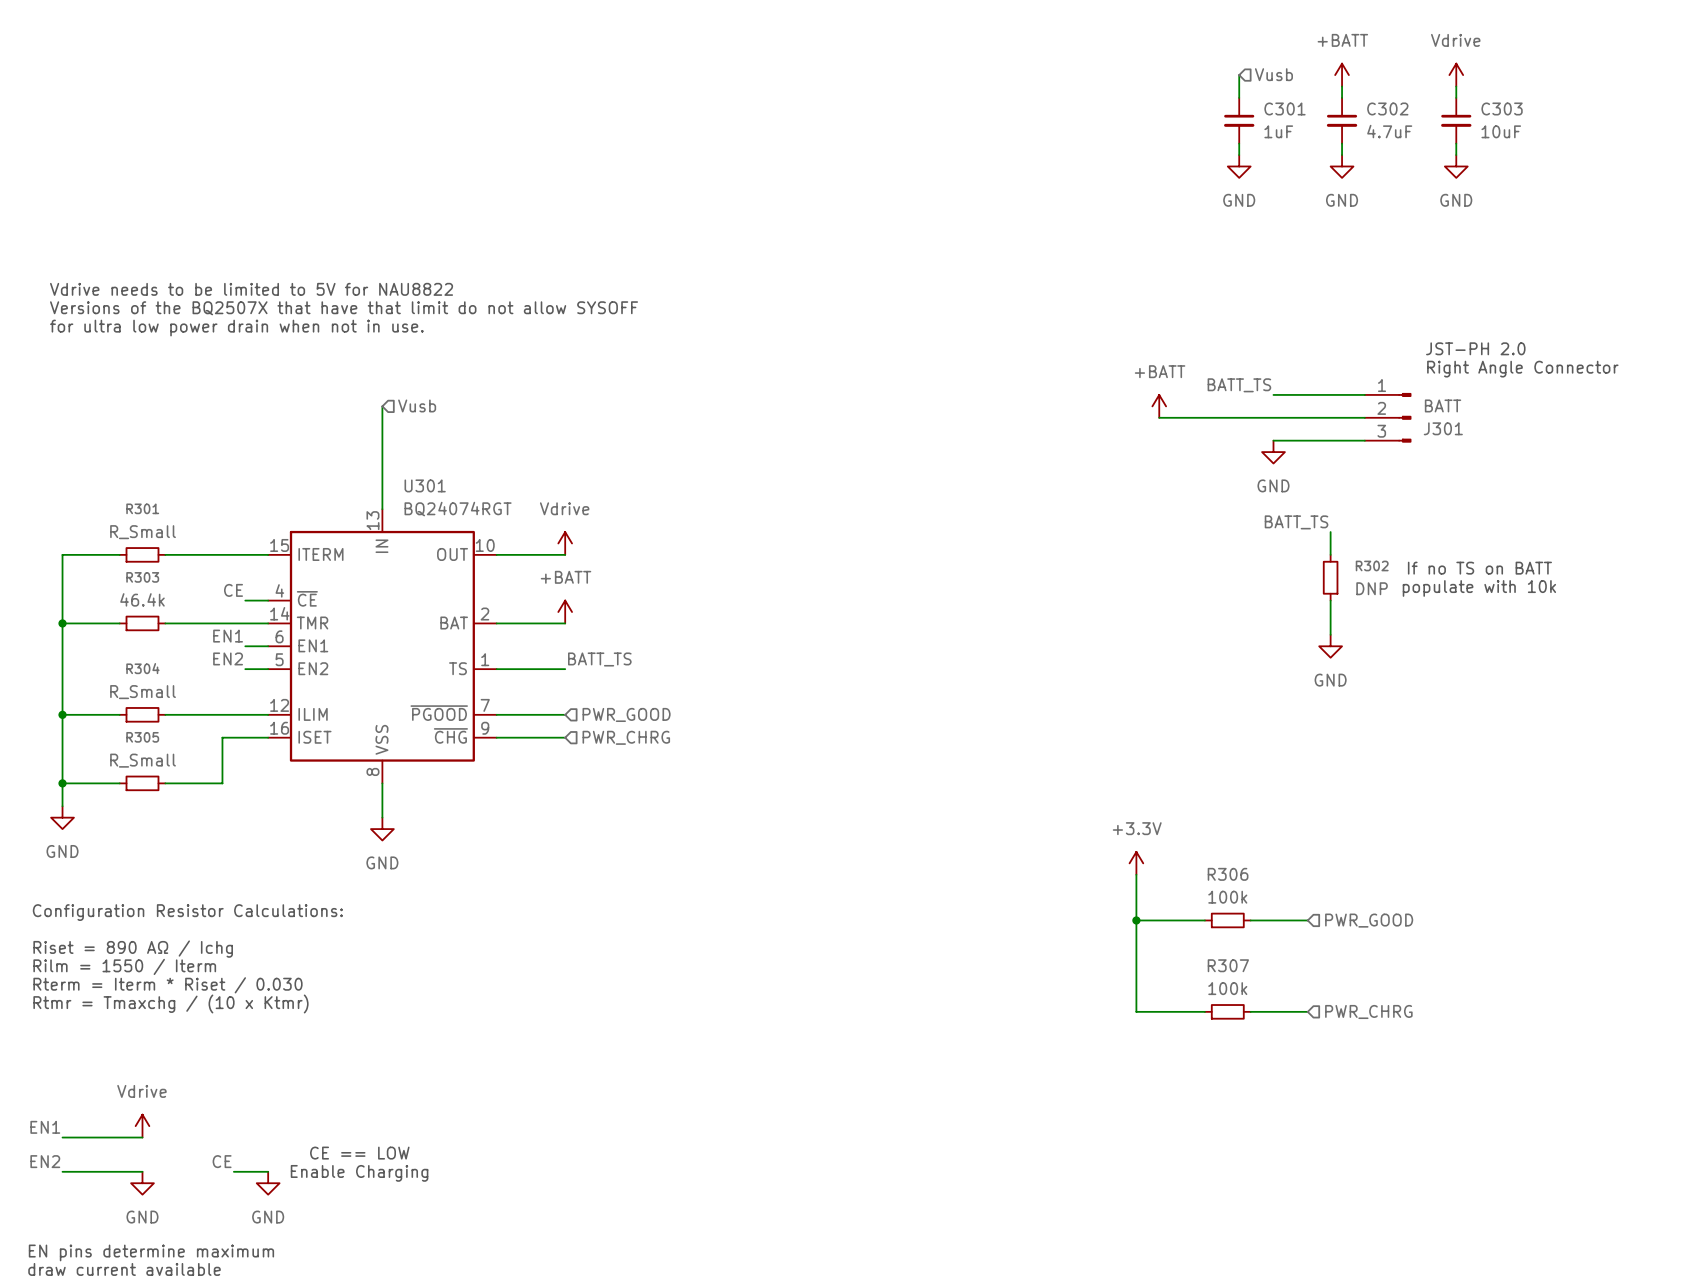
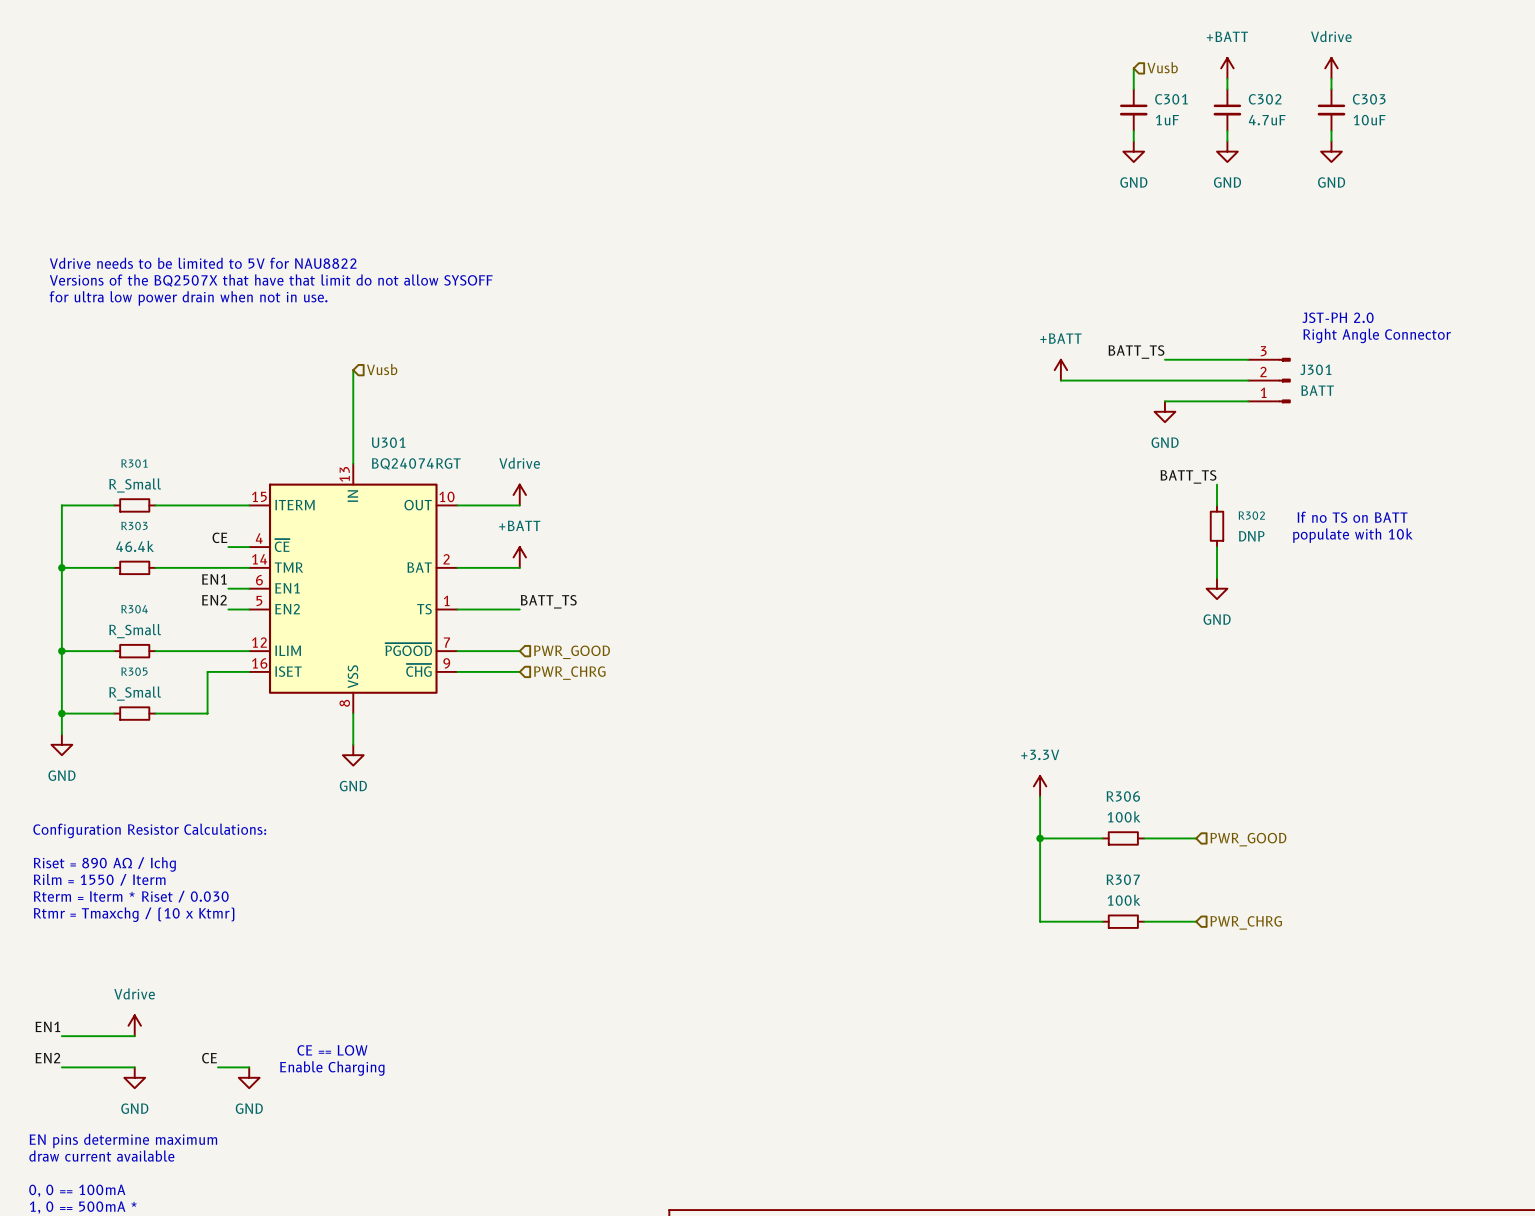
J301 flip: as is (1404, 417) -> up-down (1284, 380)

